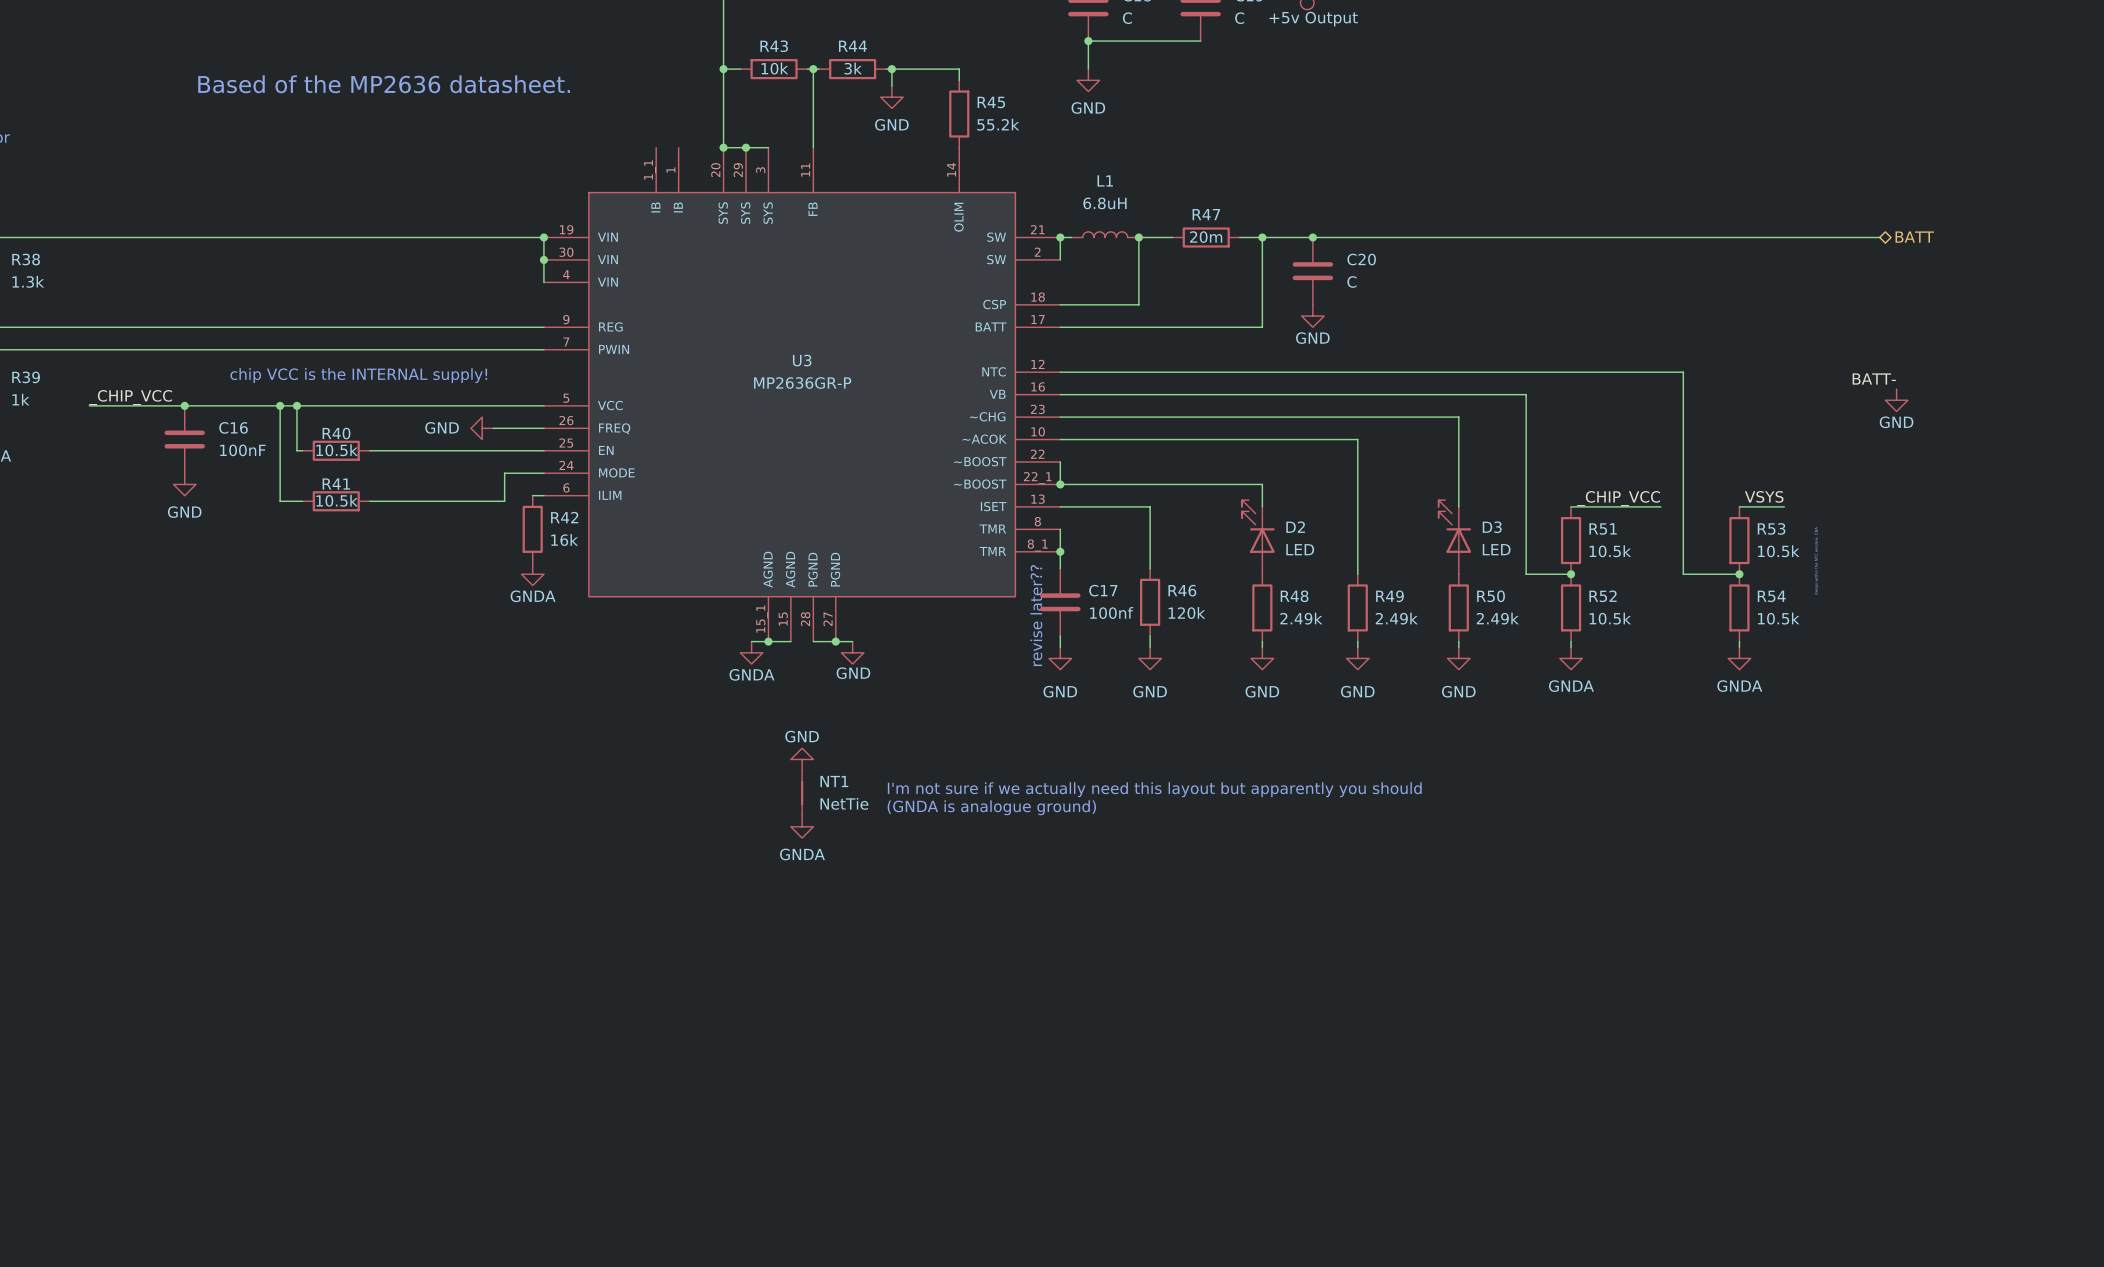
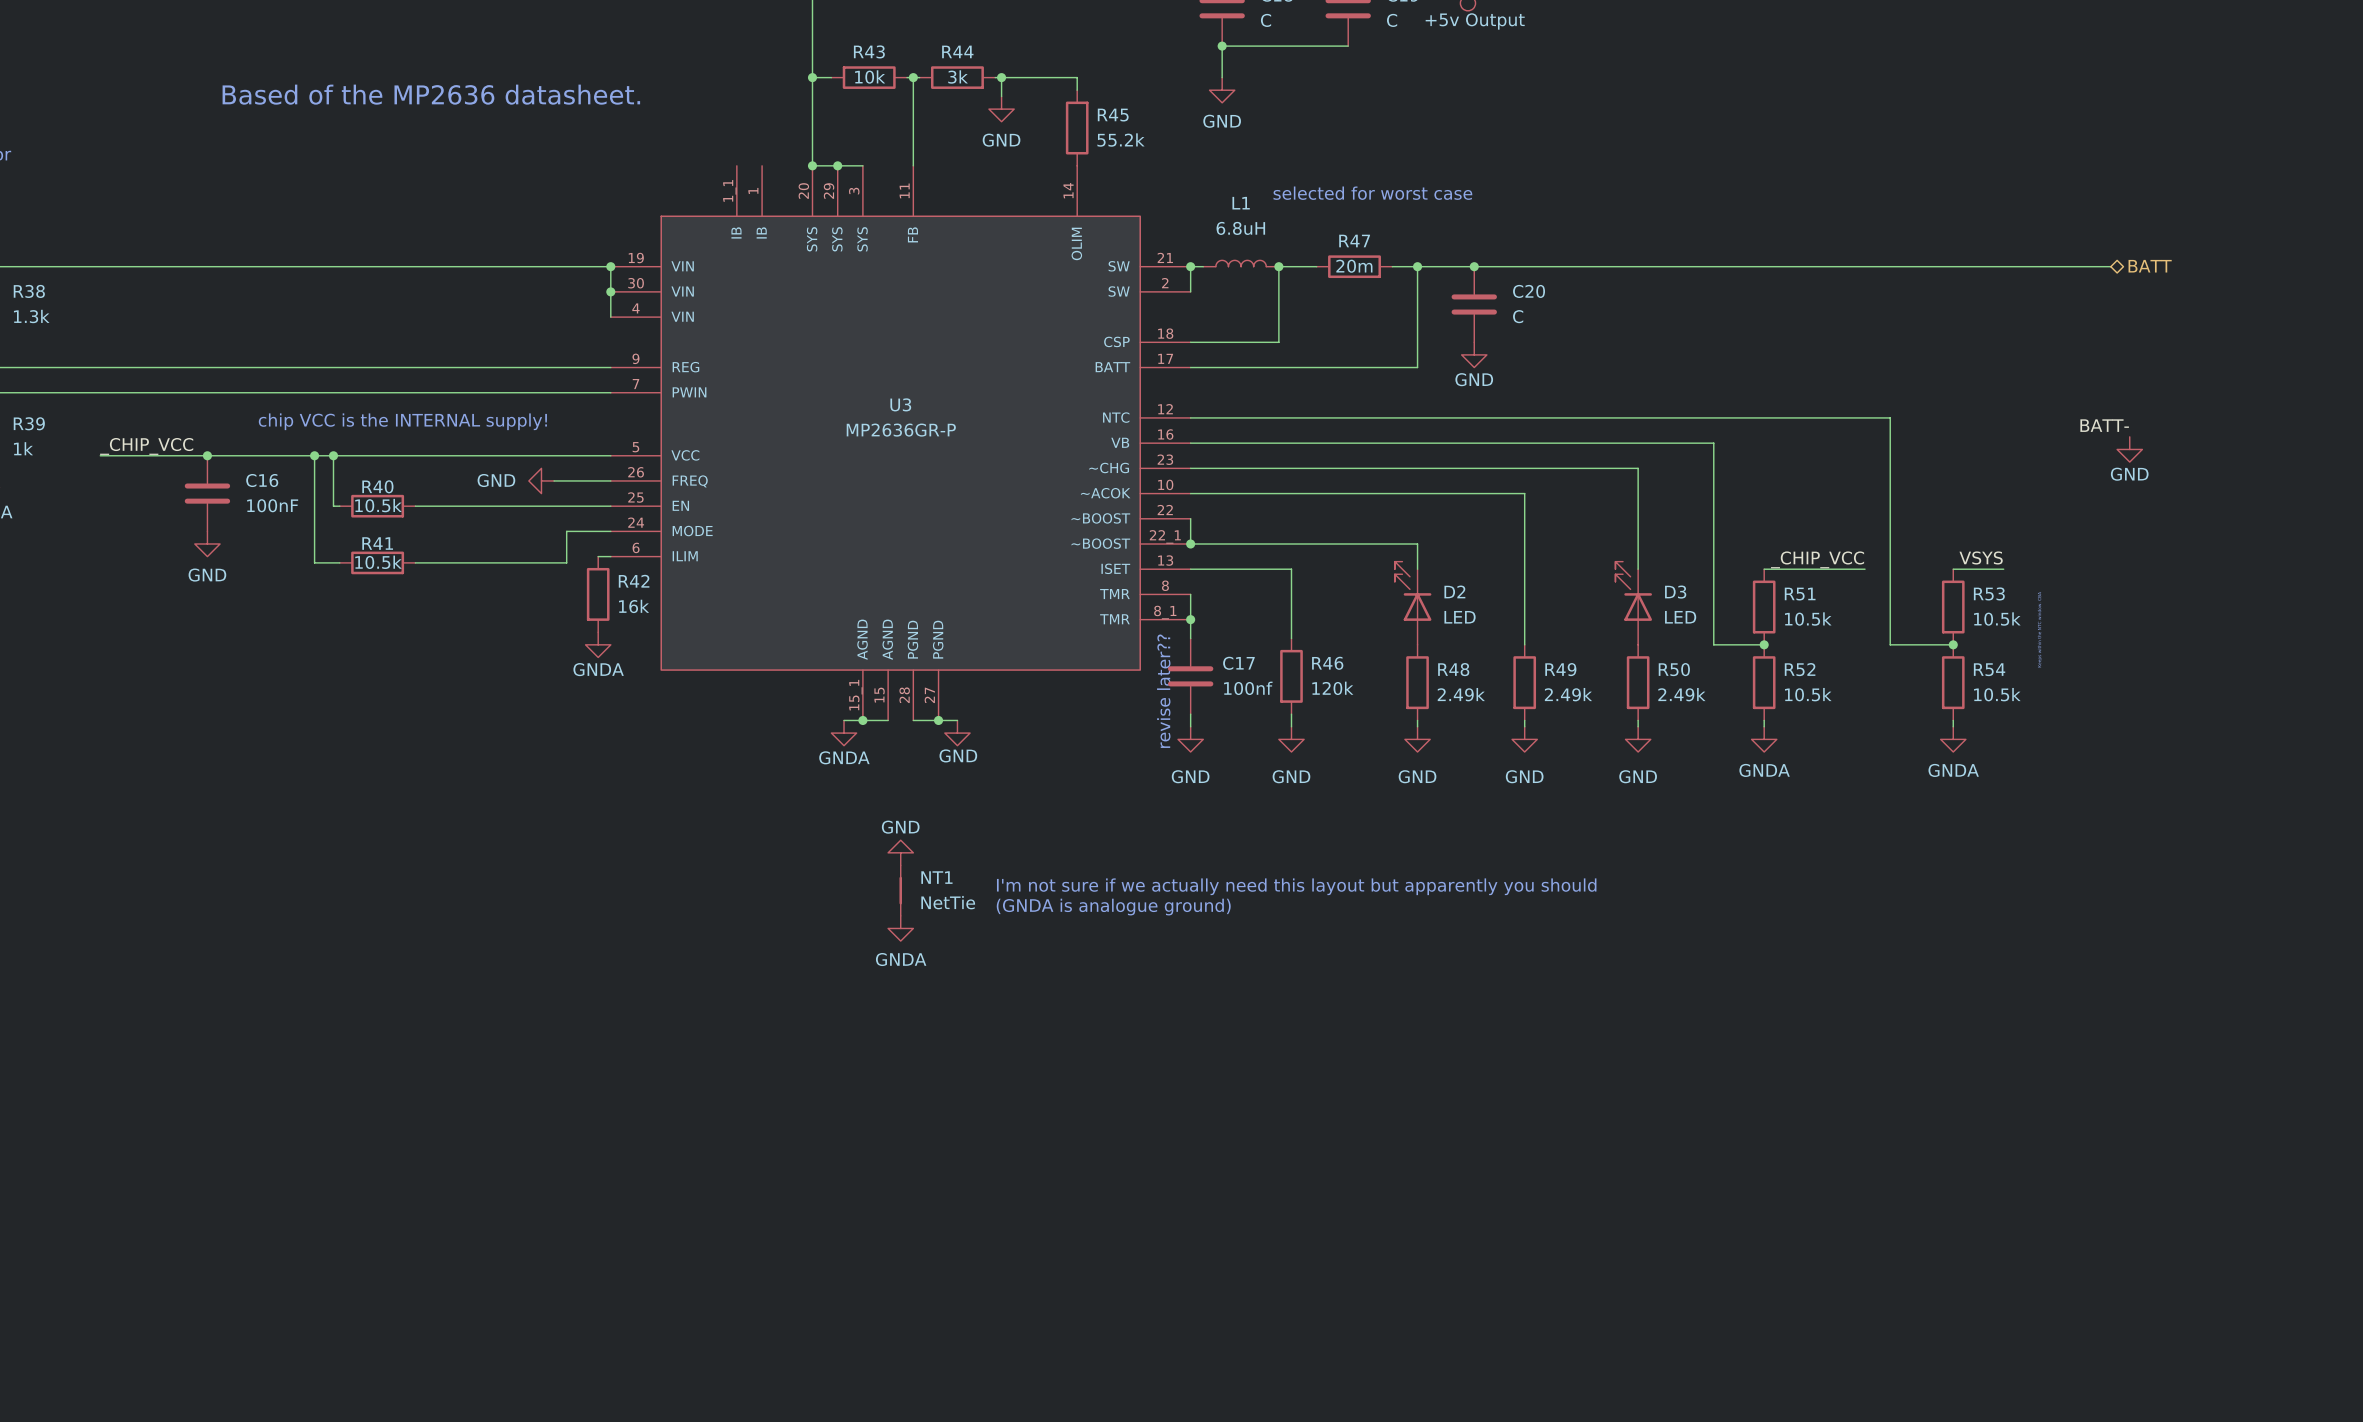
text: none -> selected for worst case (1372, 193)

